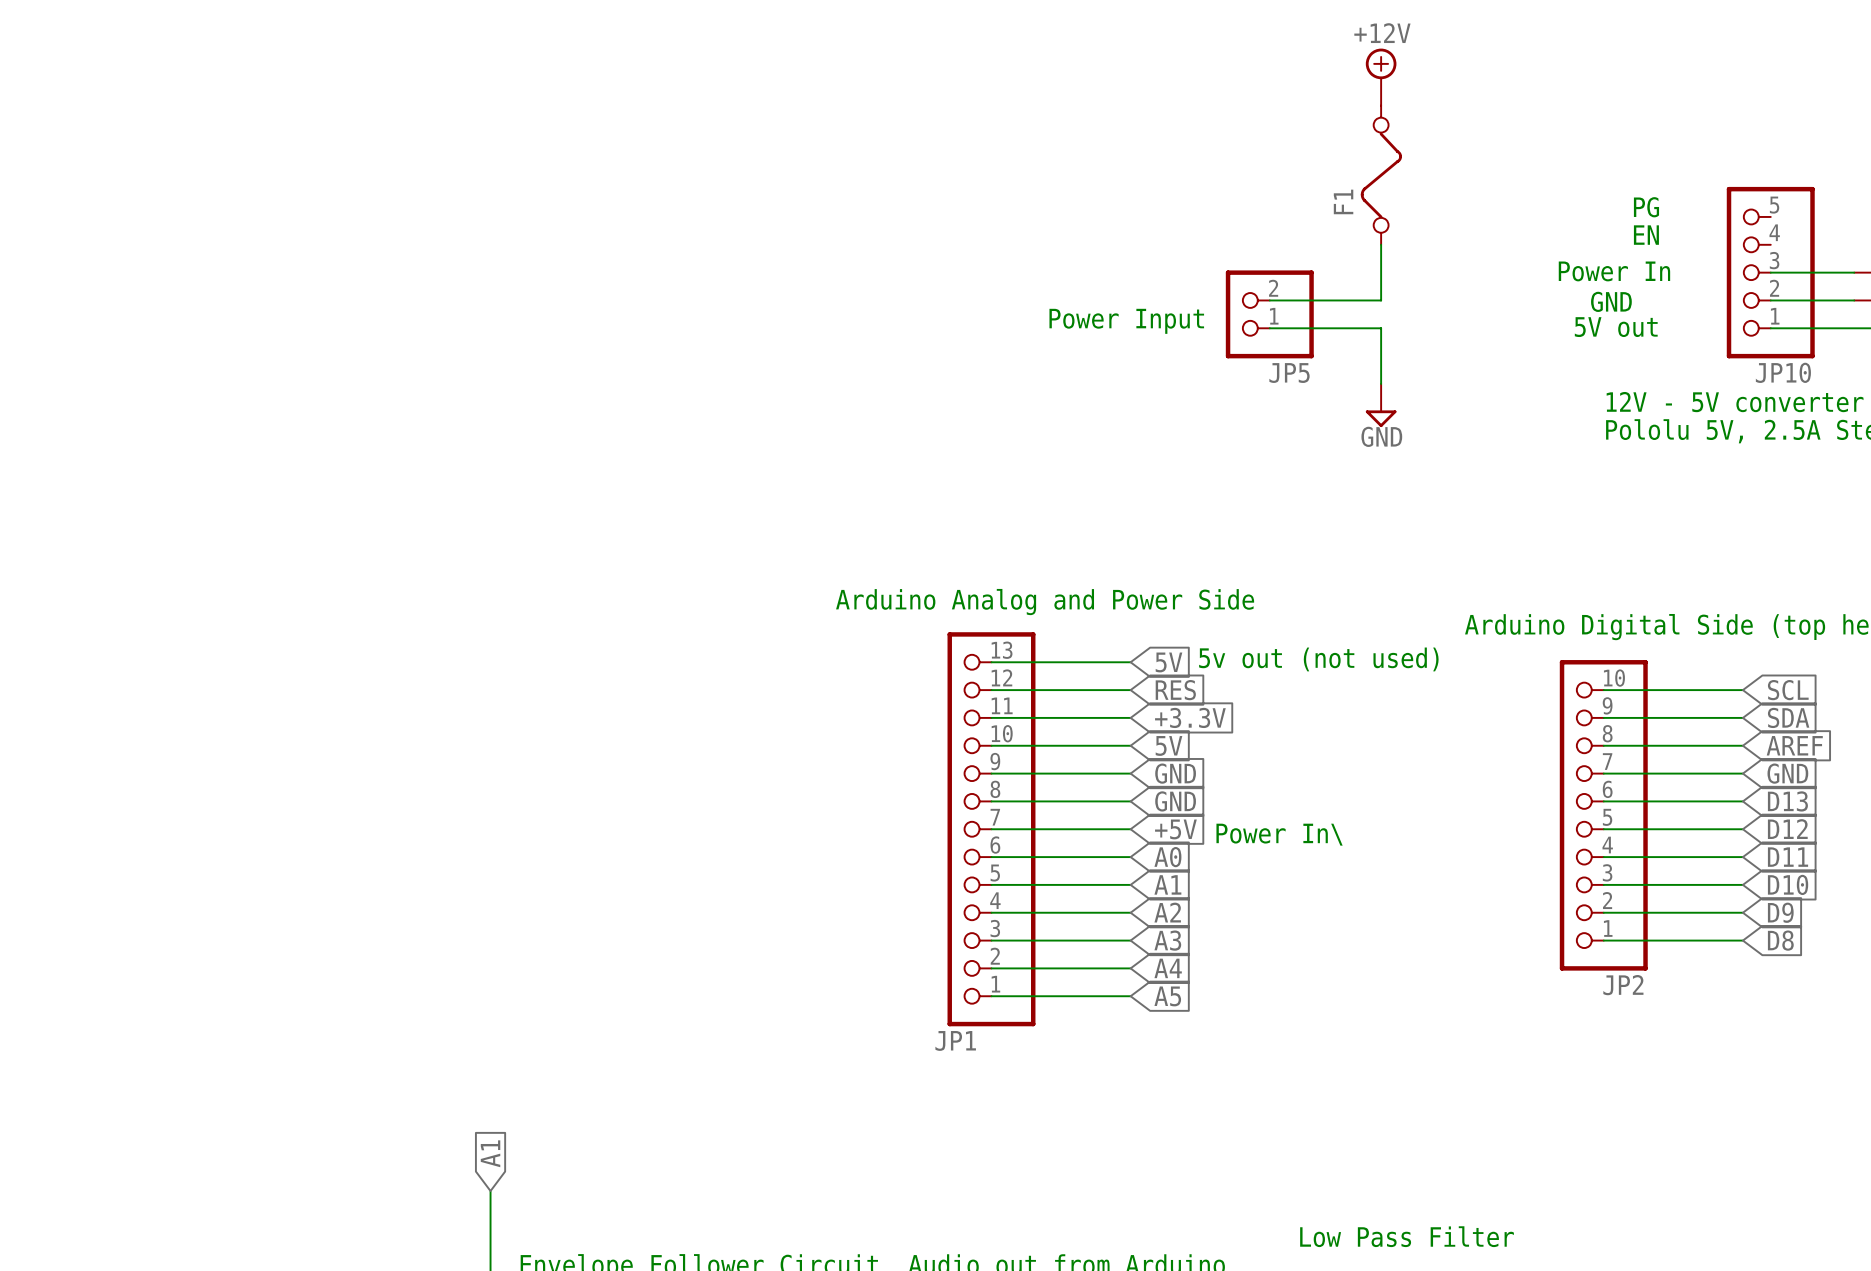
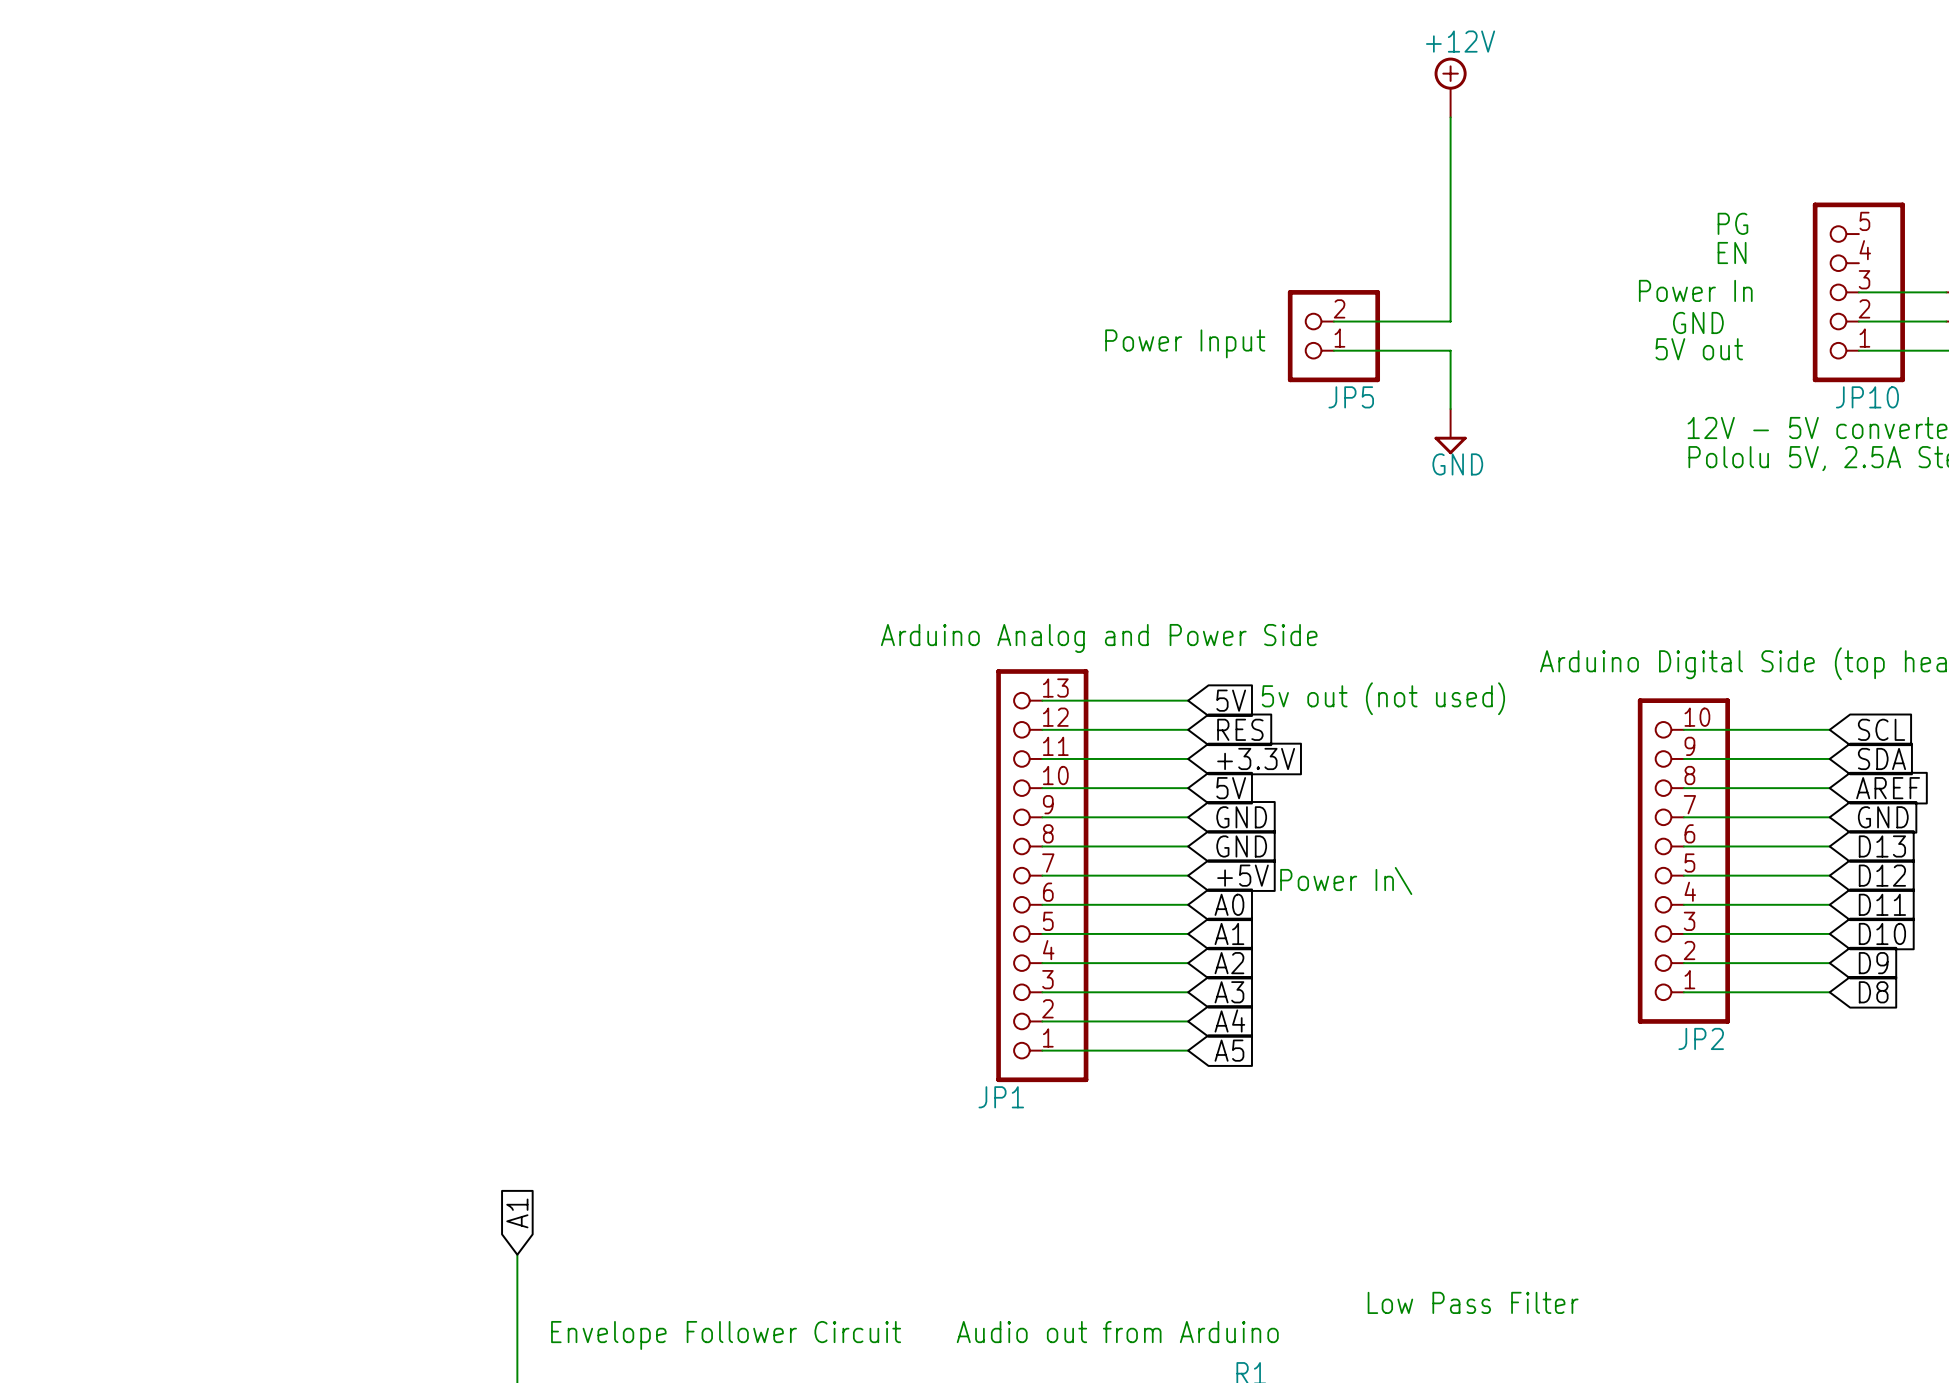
wire: none -> (1450, 117) (1450, 263)
F1: (1381, 175) -> none

